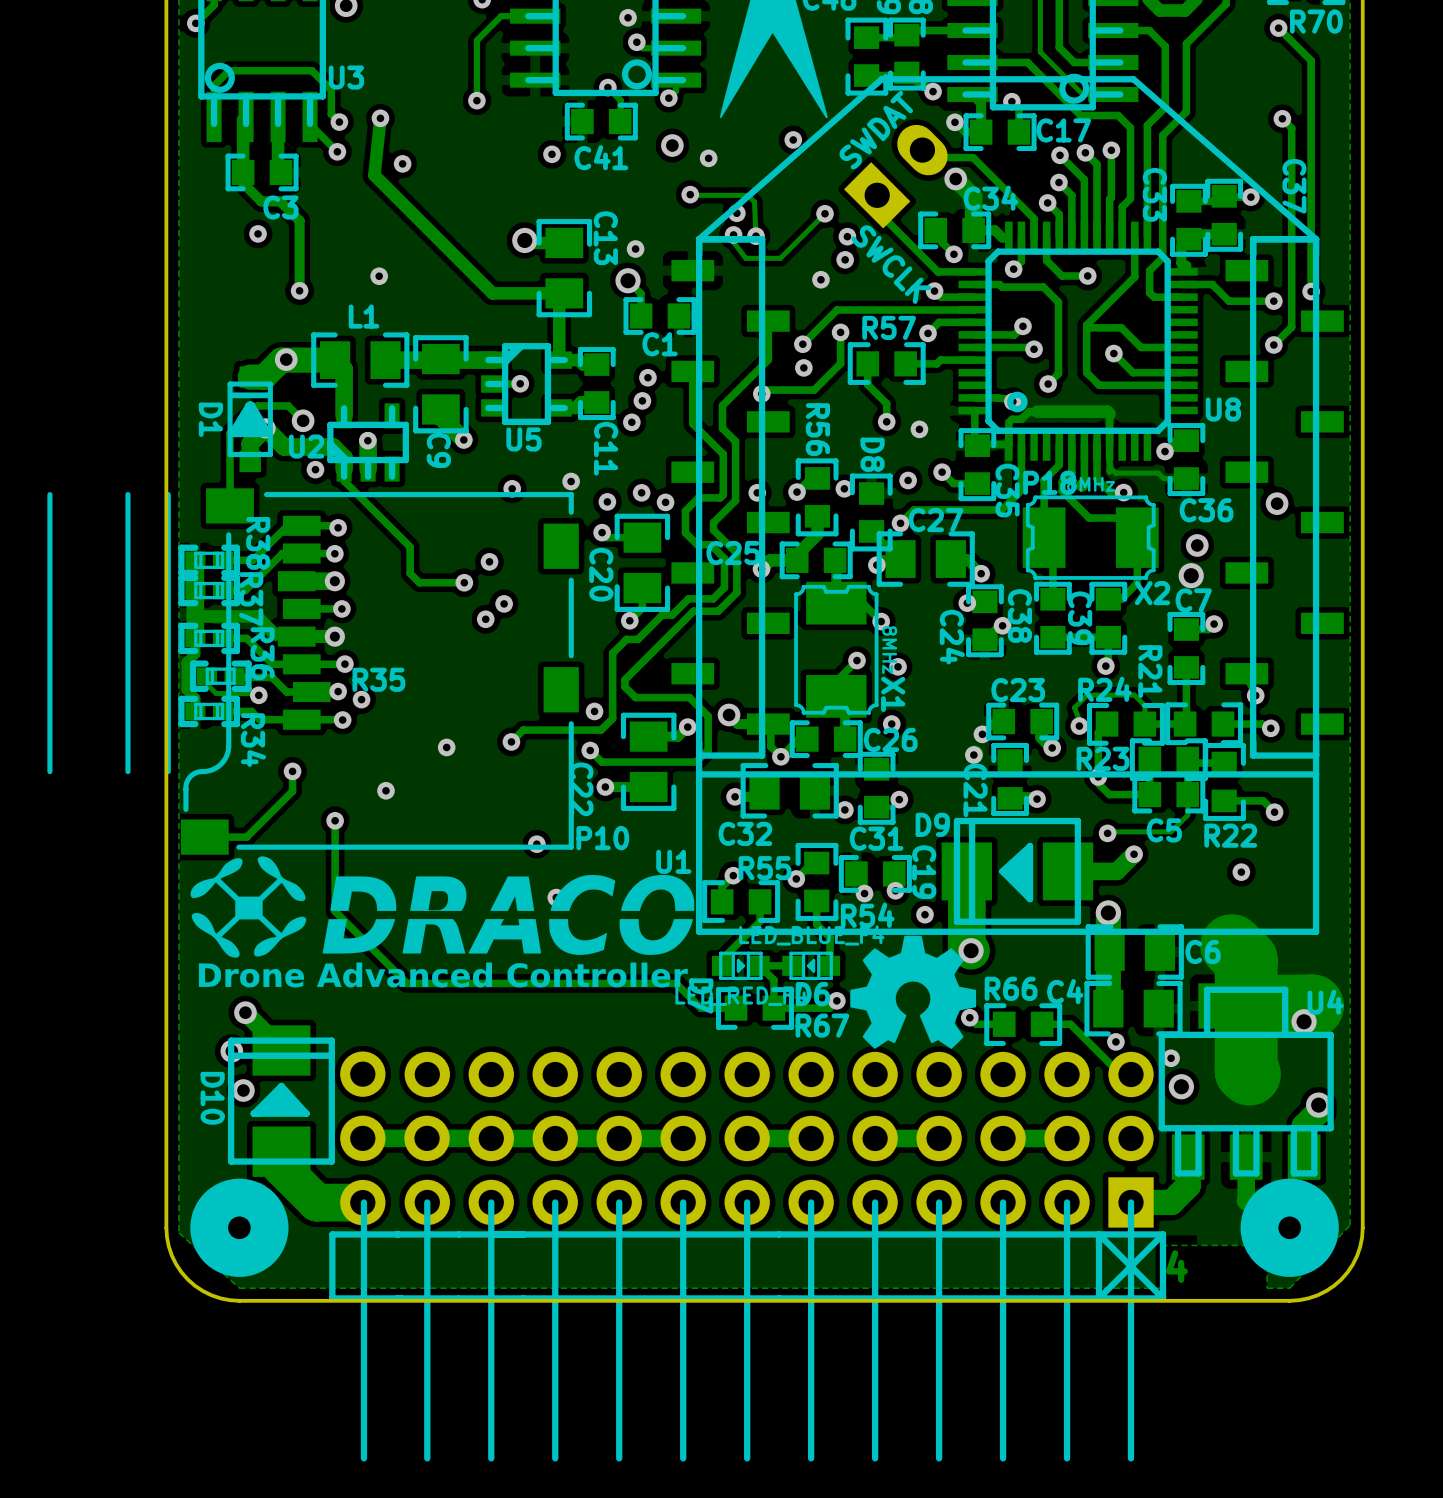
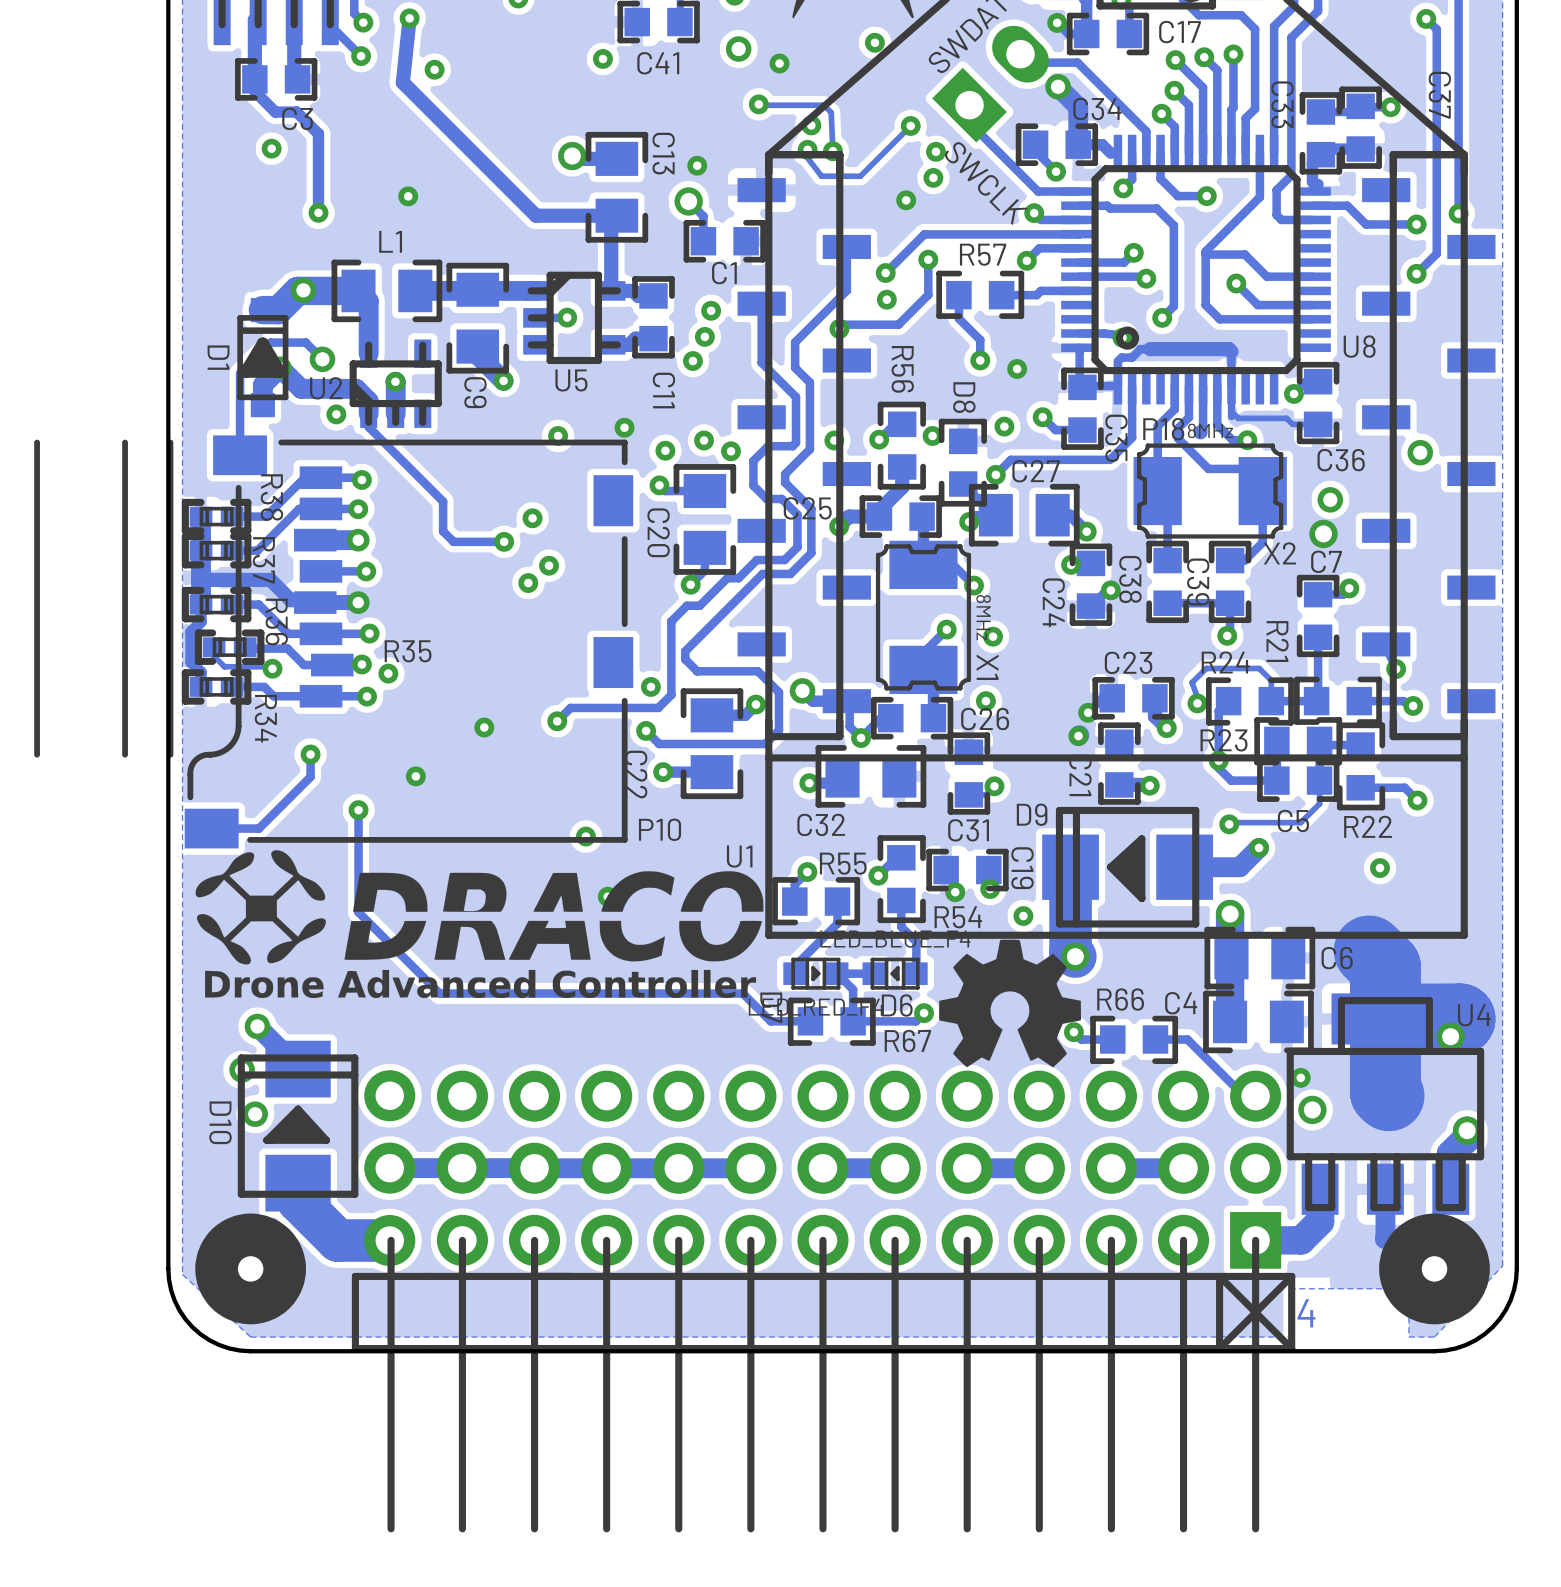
via: (844, 809) -> none
via: (1115, 1041) -> none

